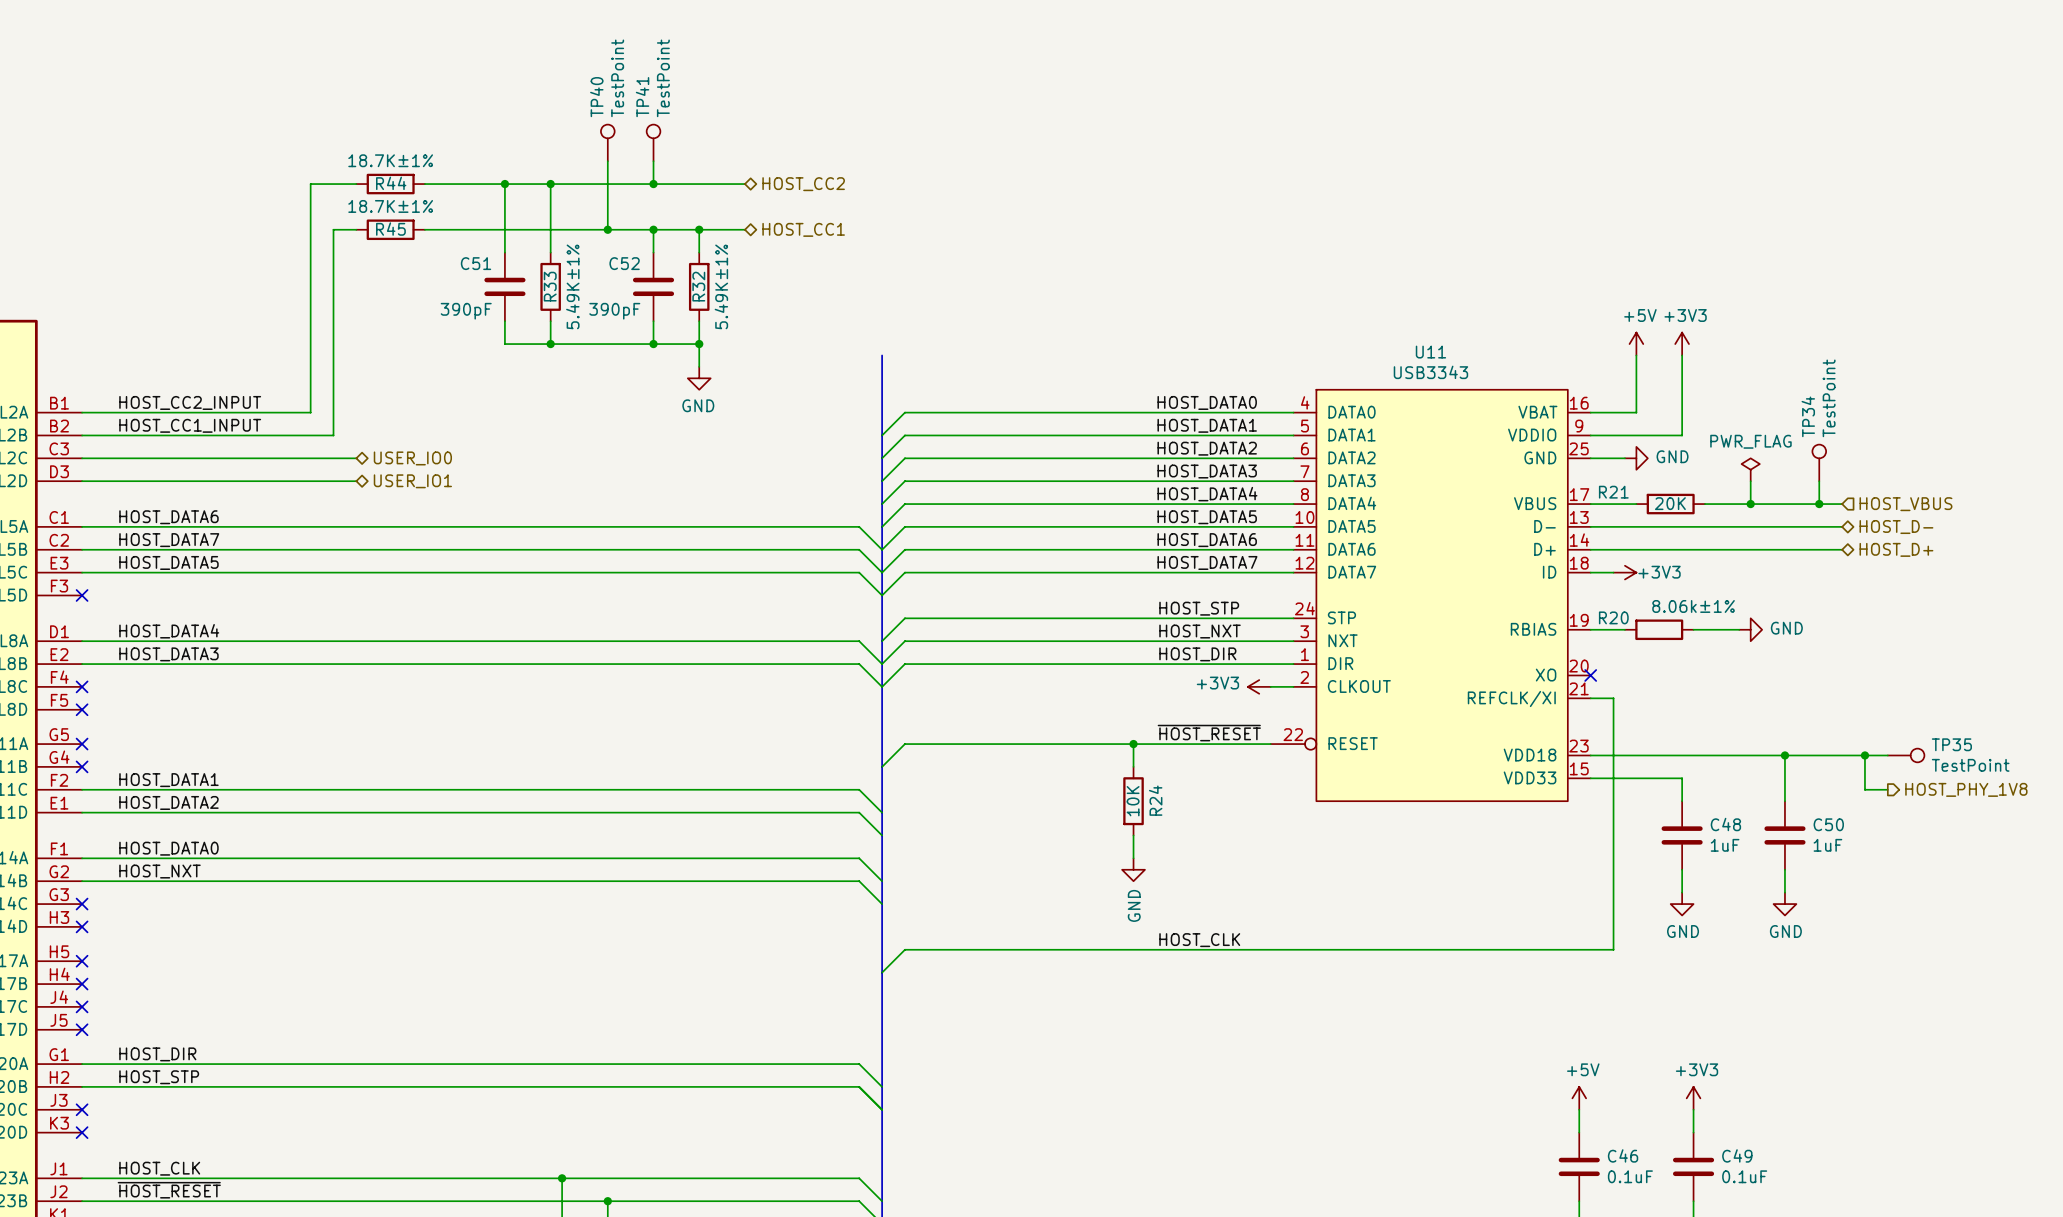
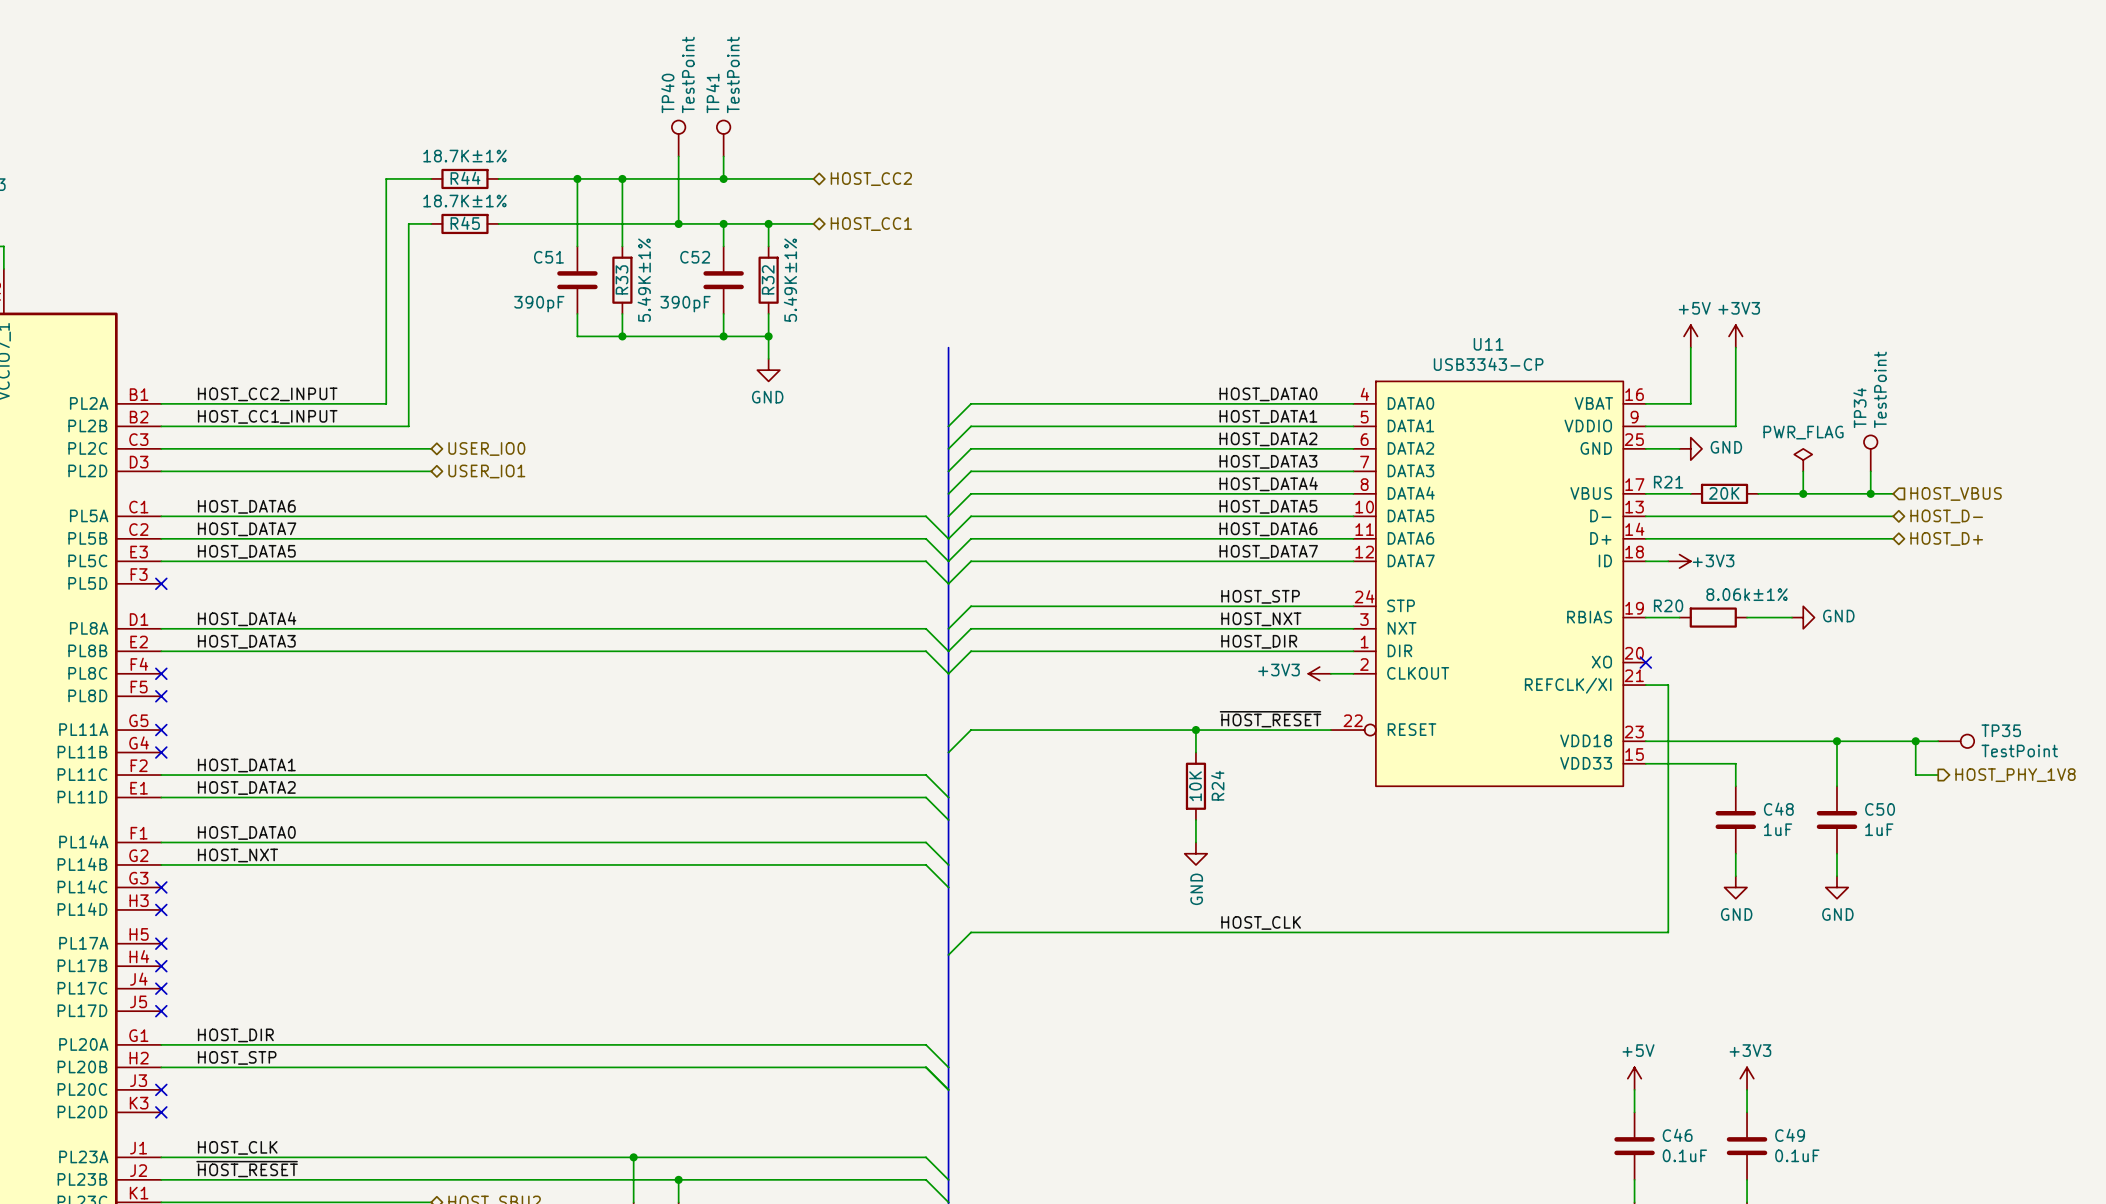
U11 value: USB3343 (1430, 372) -> USB3343-CP (1488, 364)

